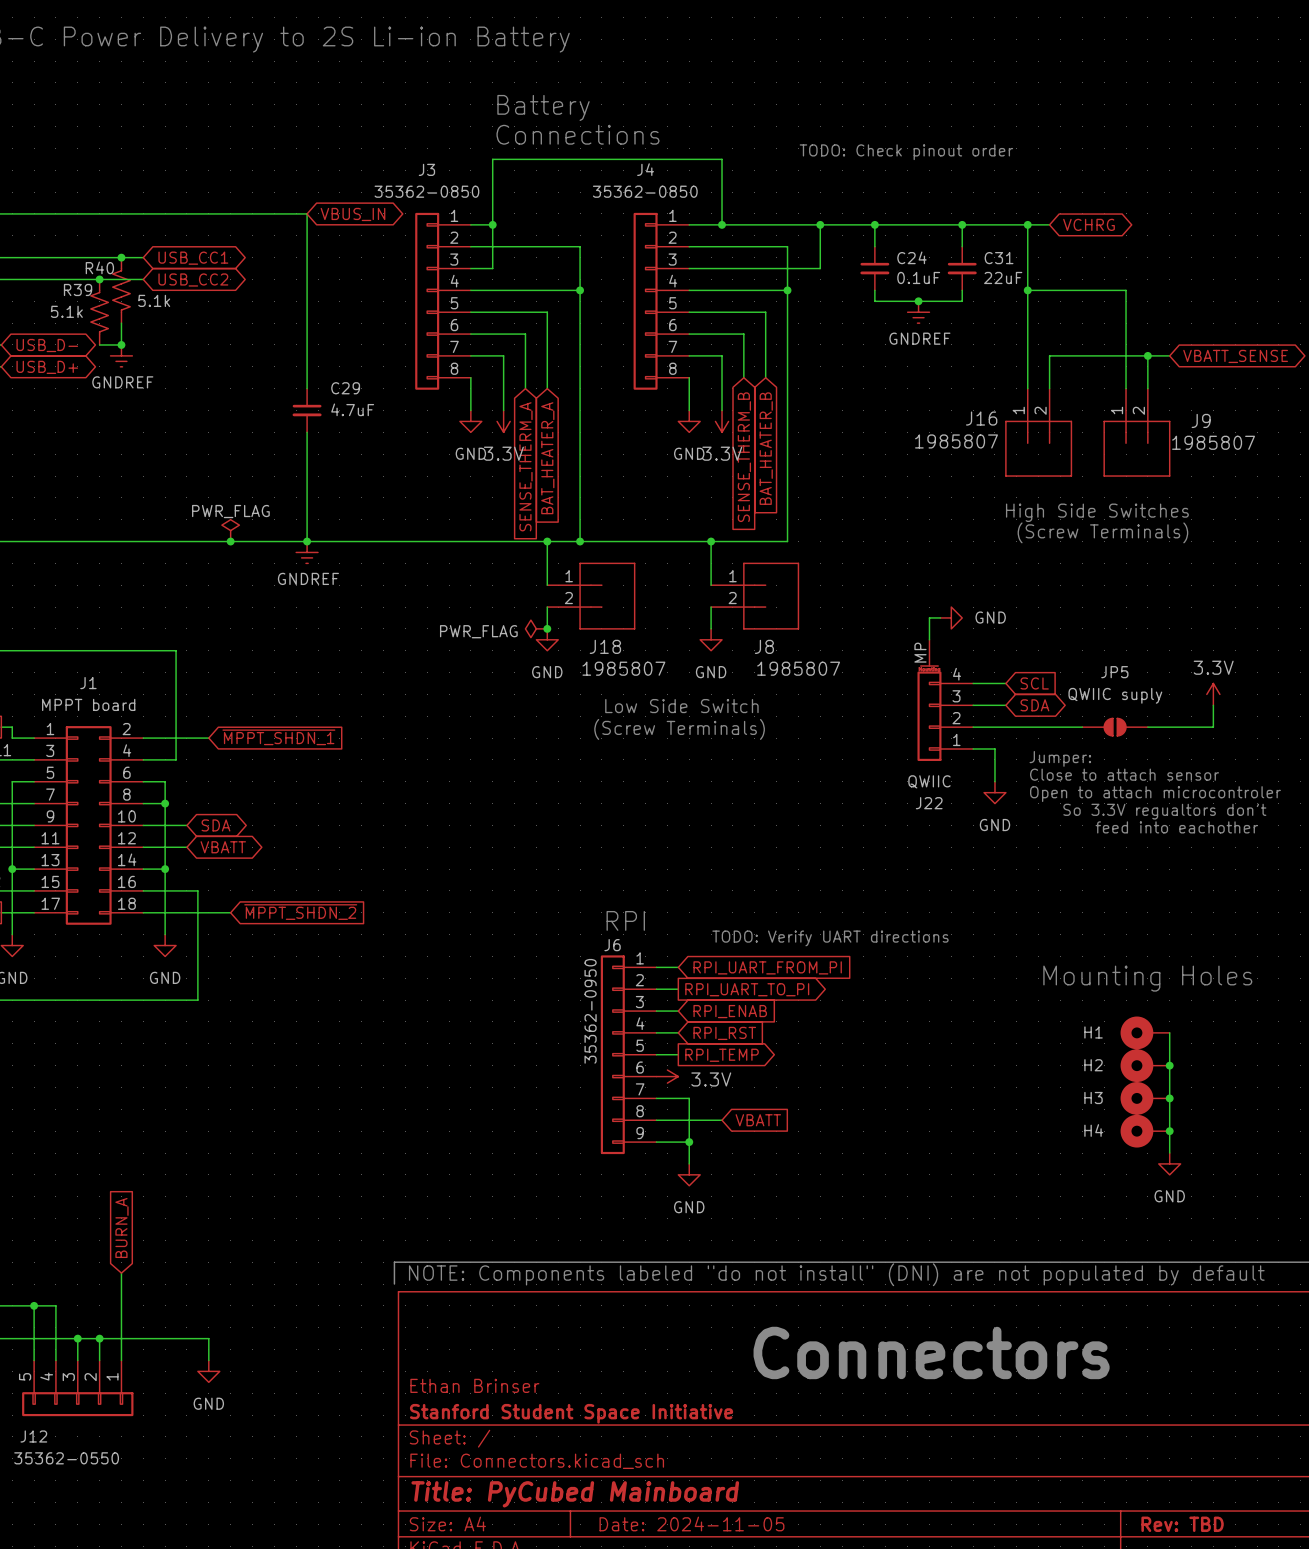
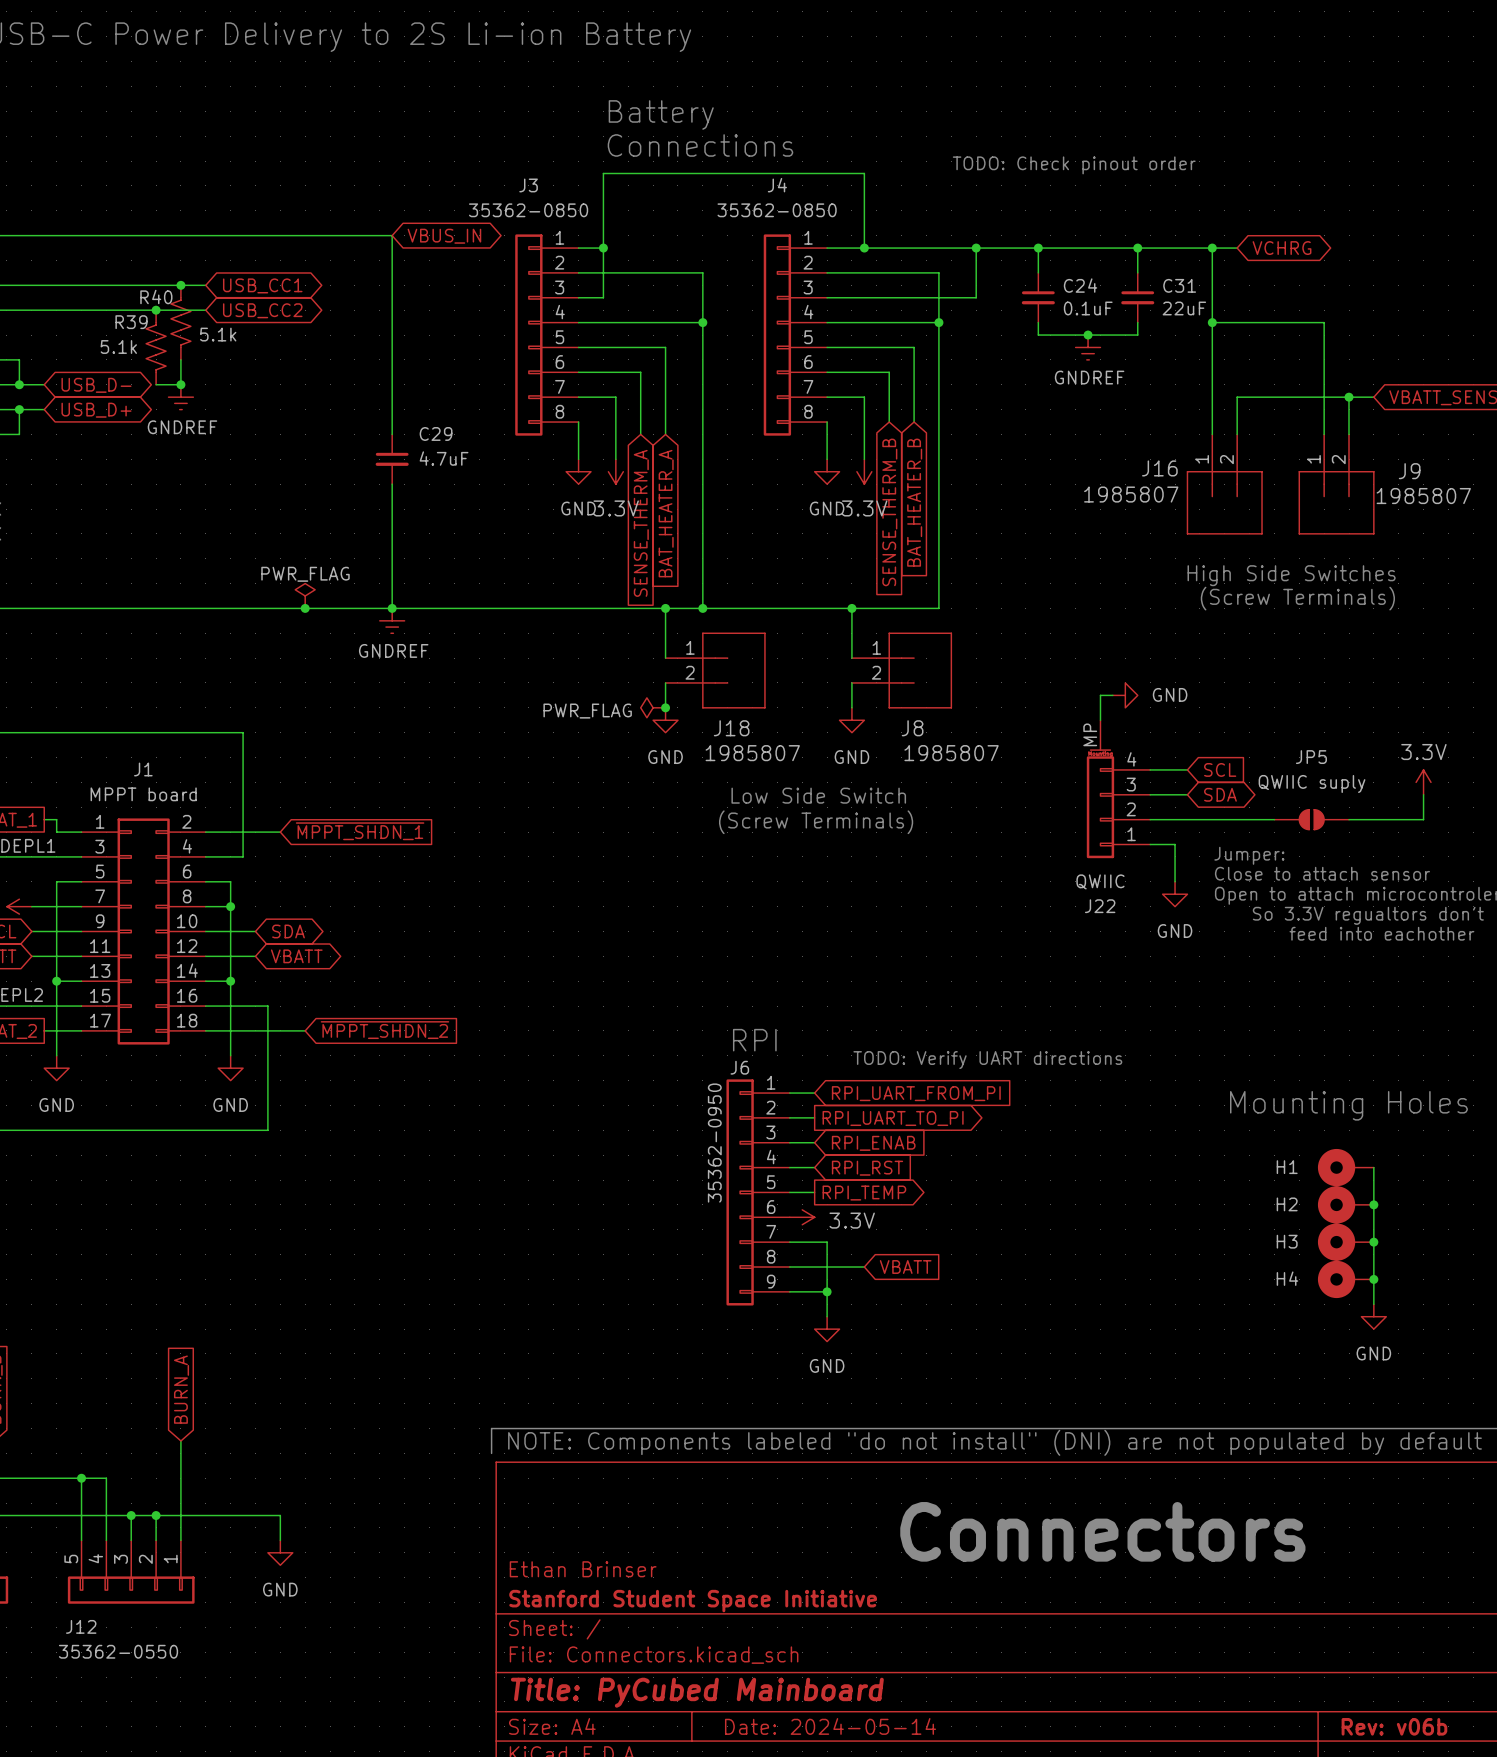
title block: Date: 2024-11-05 (691, 1523) -> Date: 2024-05-14 (830, 1726)
title block: Rev: TBD (1182, 1524) -> Rev: v06b (1394, 1726)

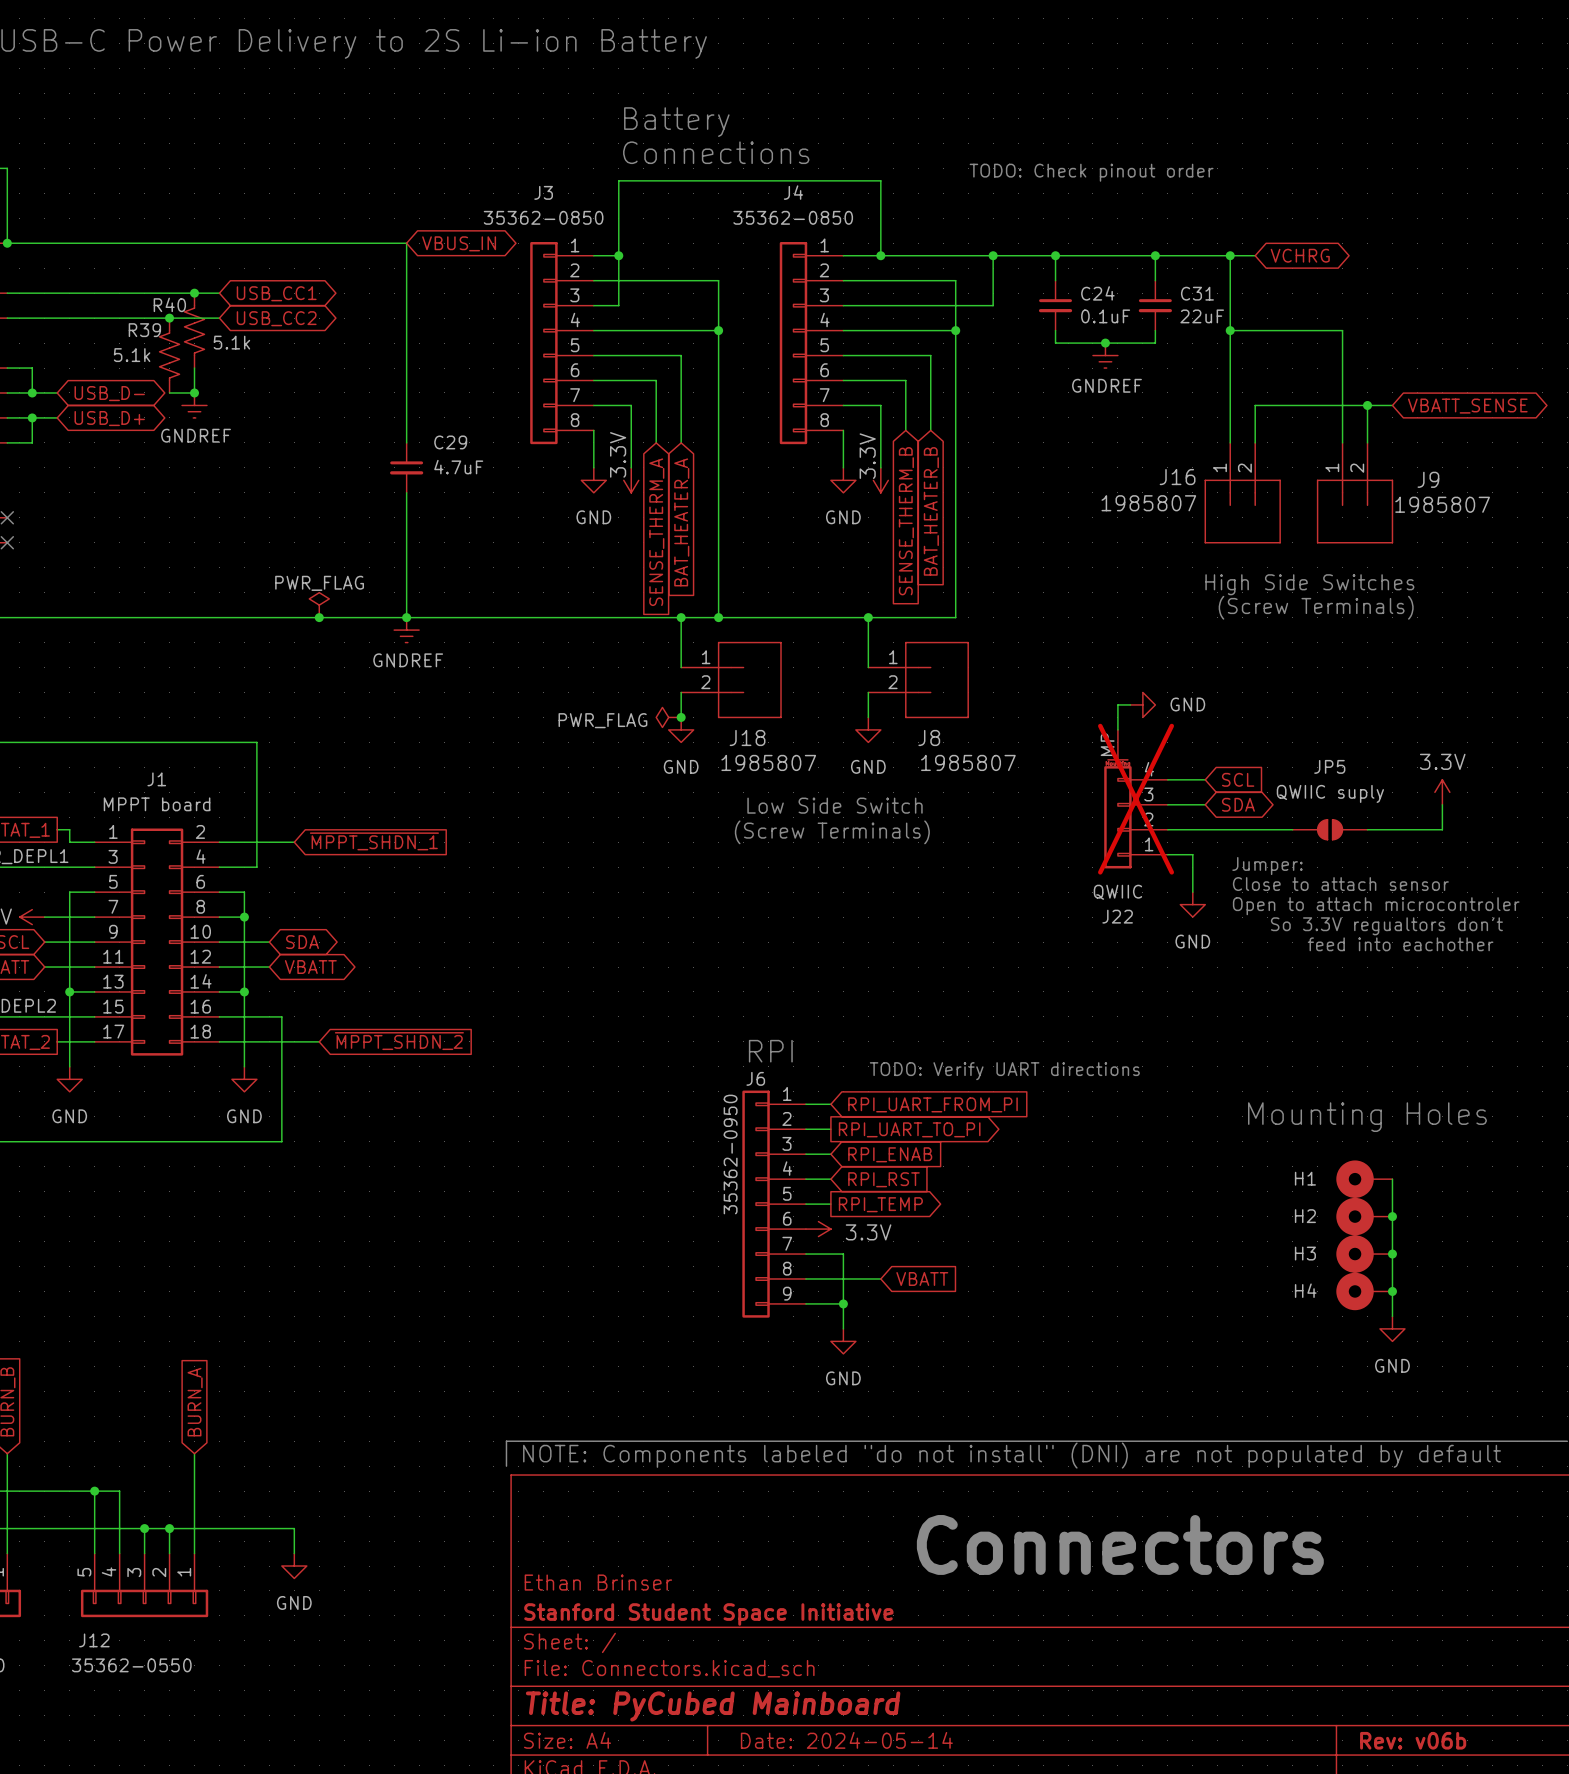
power symbol text rotation: 0° (616, 508) -> 90° counterclockwise (618, 454)
power symbol text rotation: 0° (864, 508) -> 90° counterclockwise (867, 456)
J22 do-not-place cross: none -> (1136, 799)

